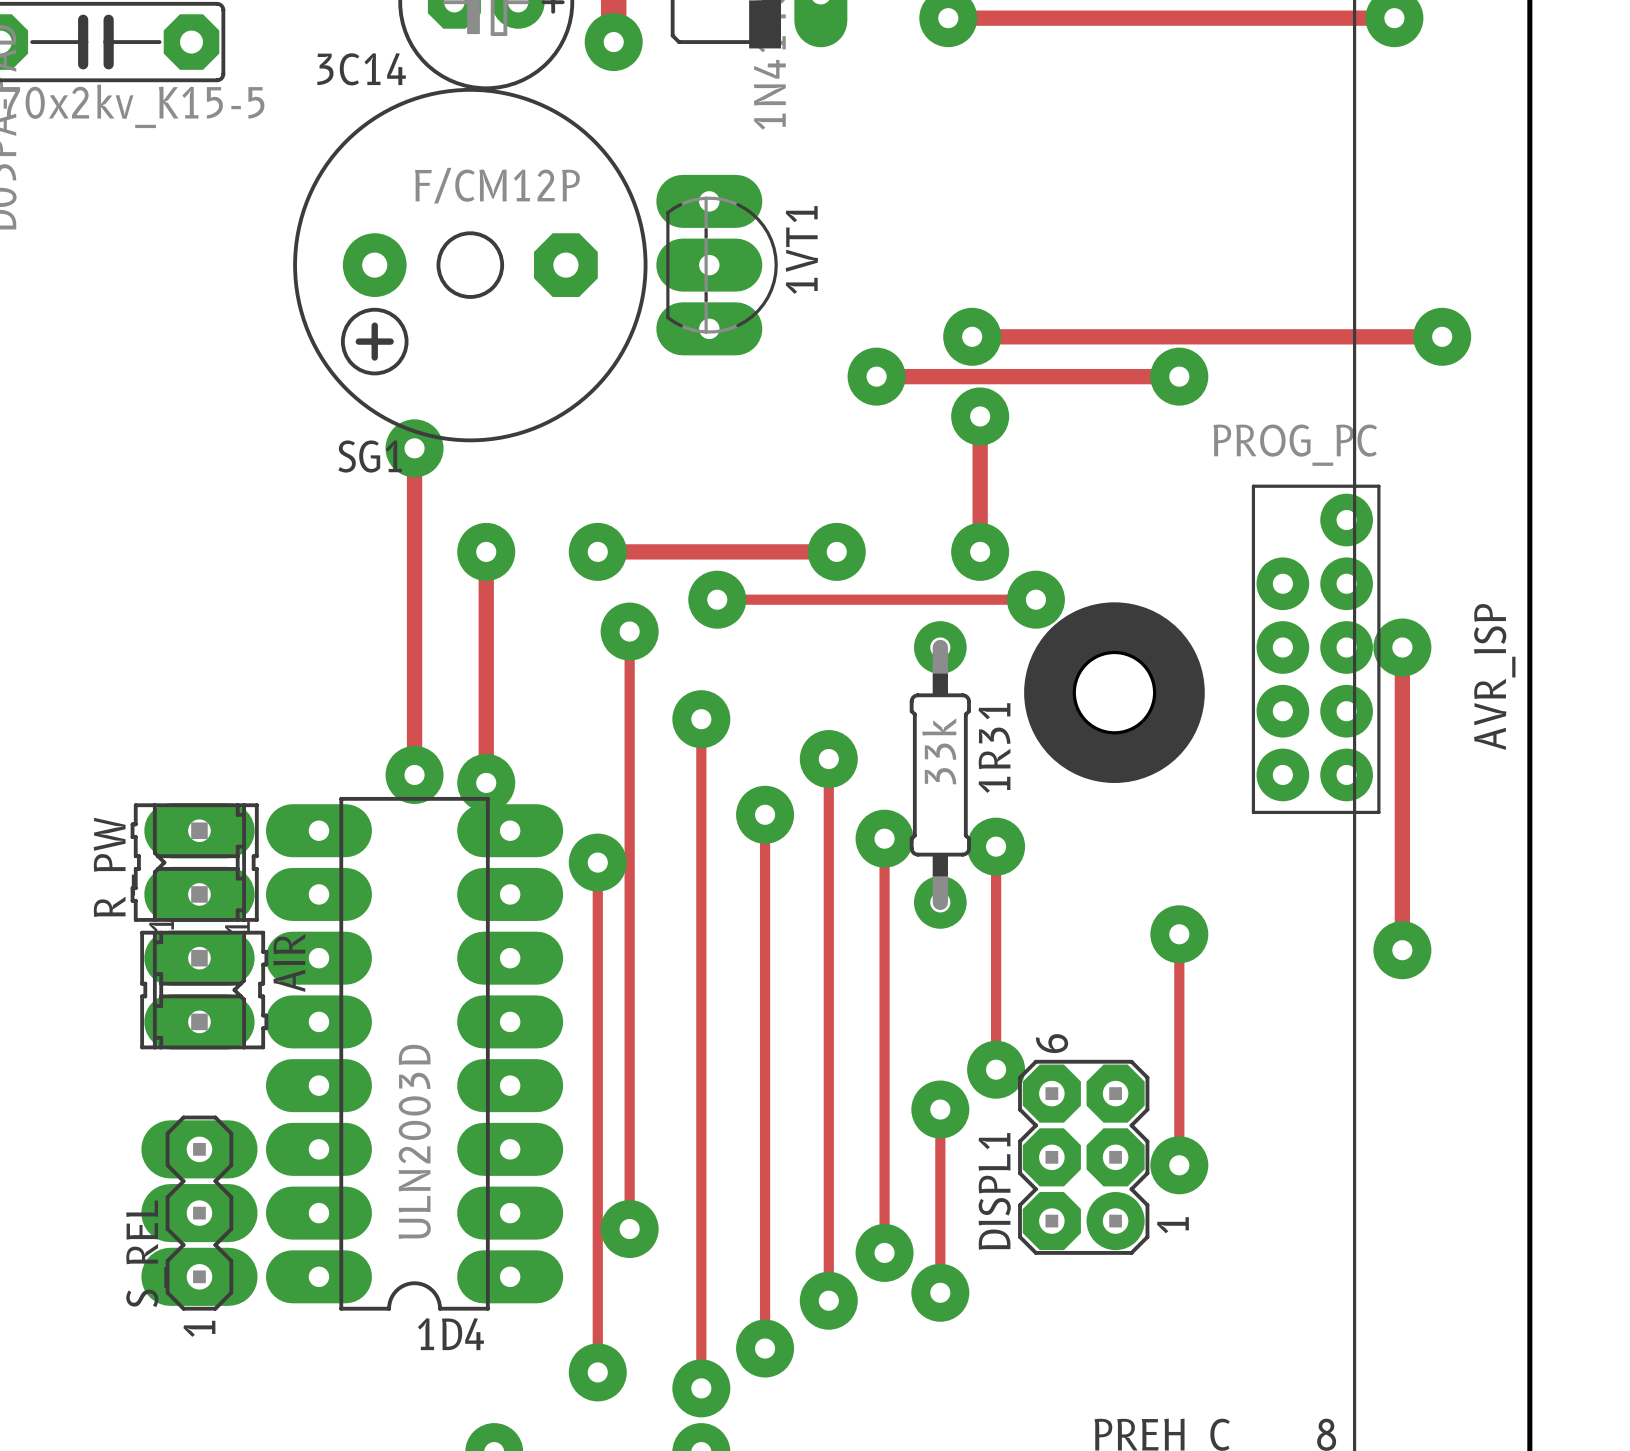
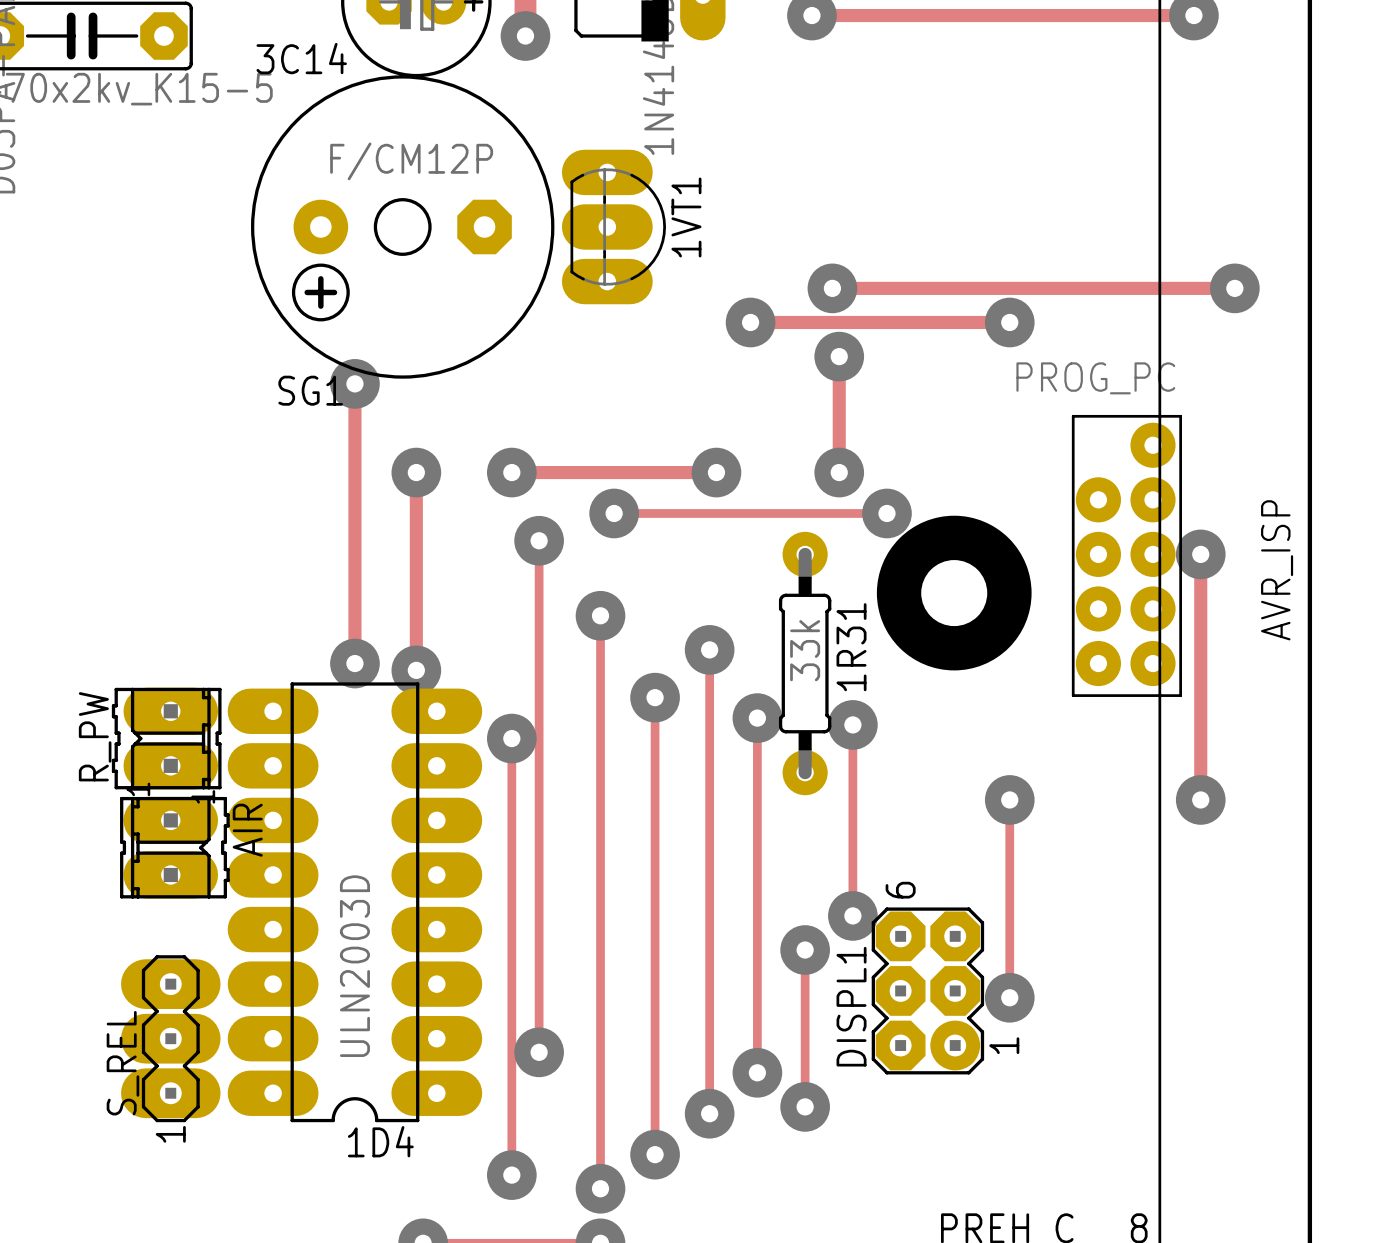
via position: (1402, 950) -> (1200, 799)

